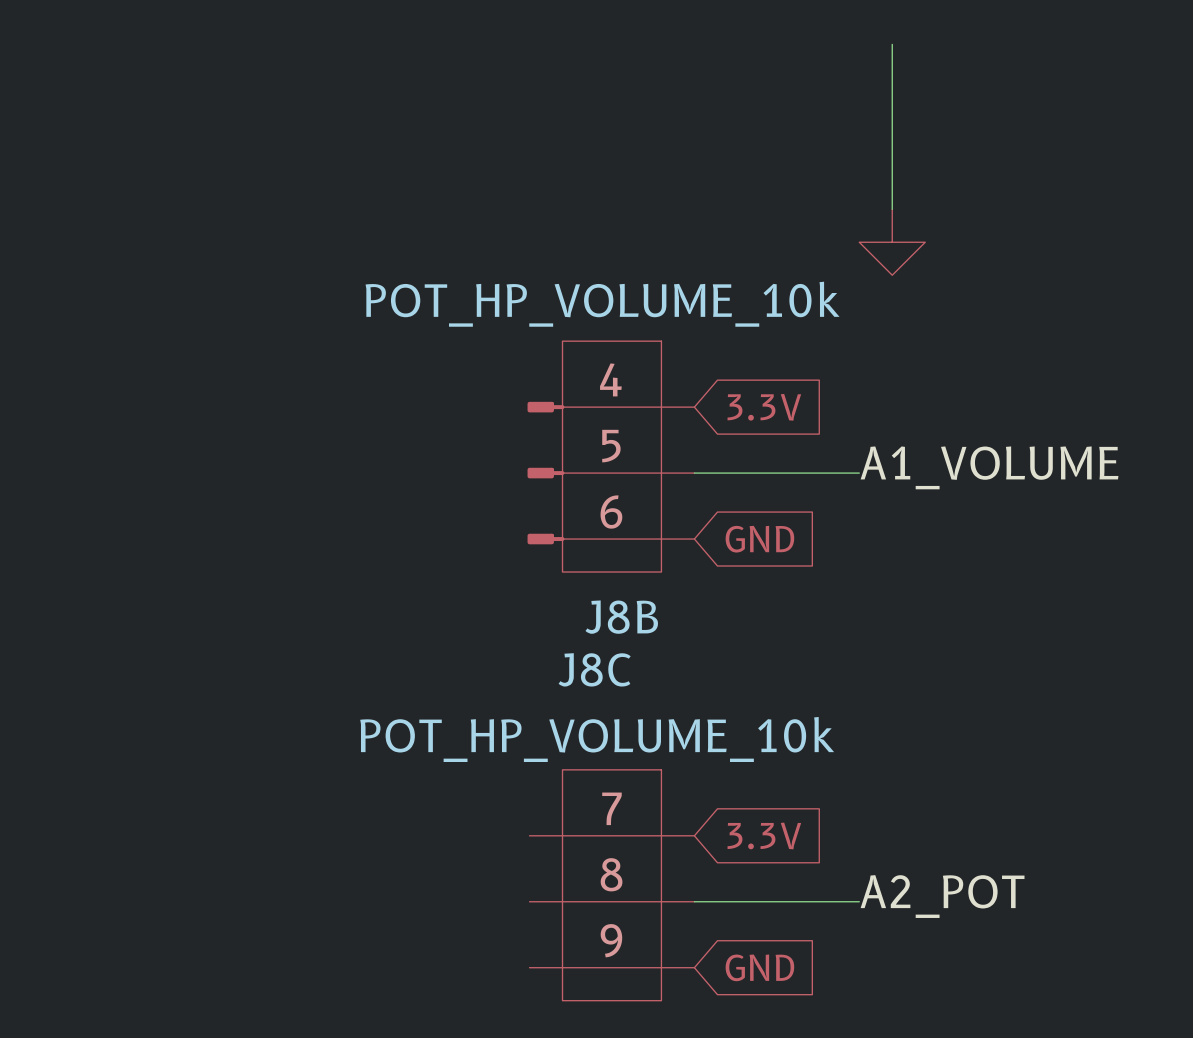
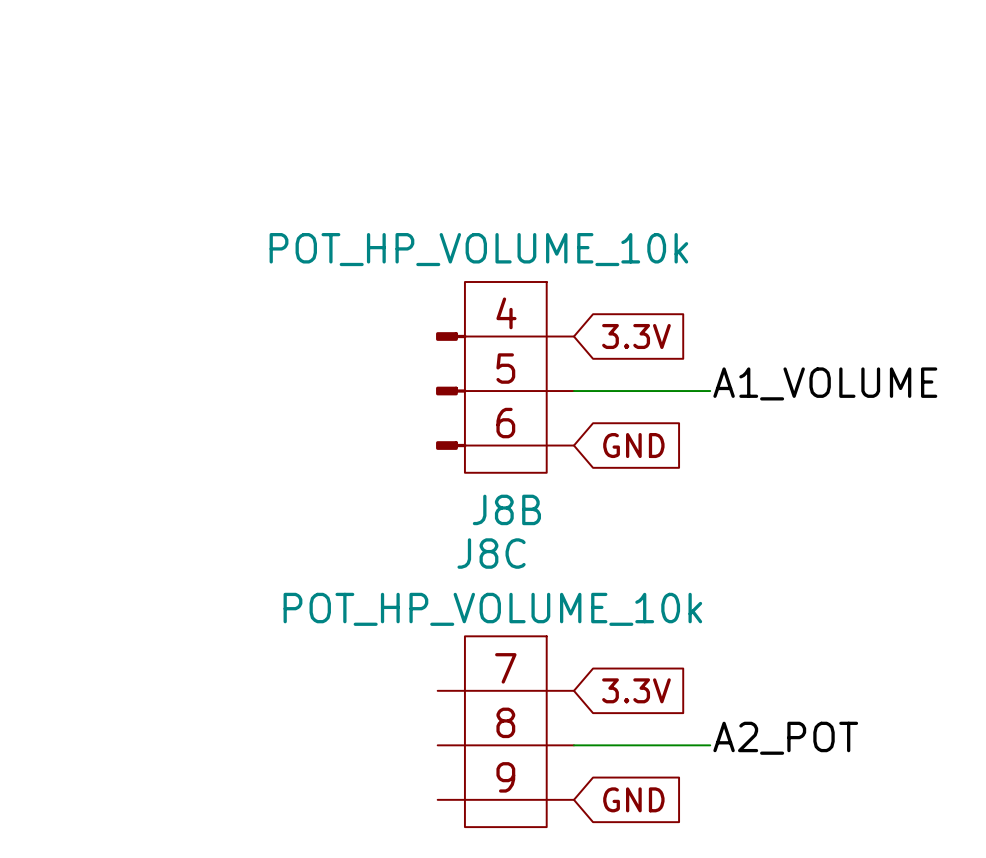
wire: (892, 44) (892, 209) -> none
power symbol: (892, 242) -> none

